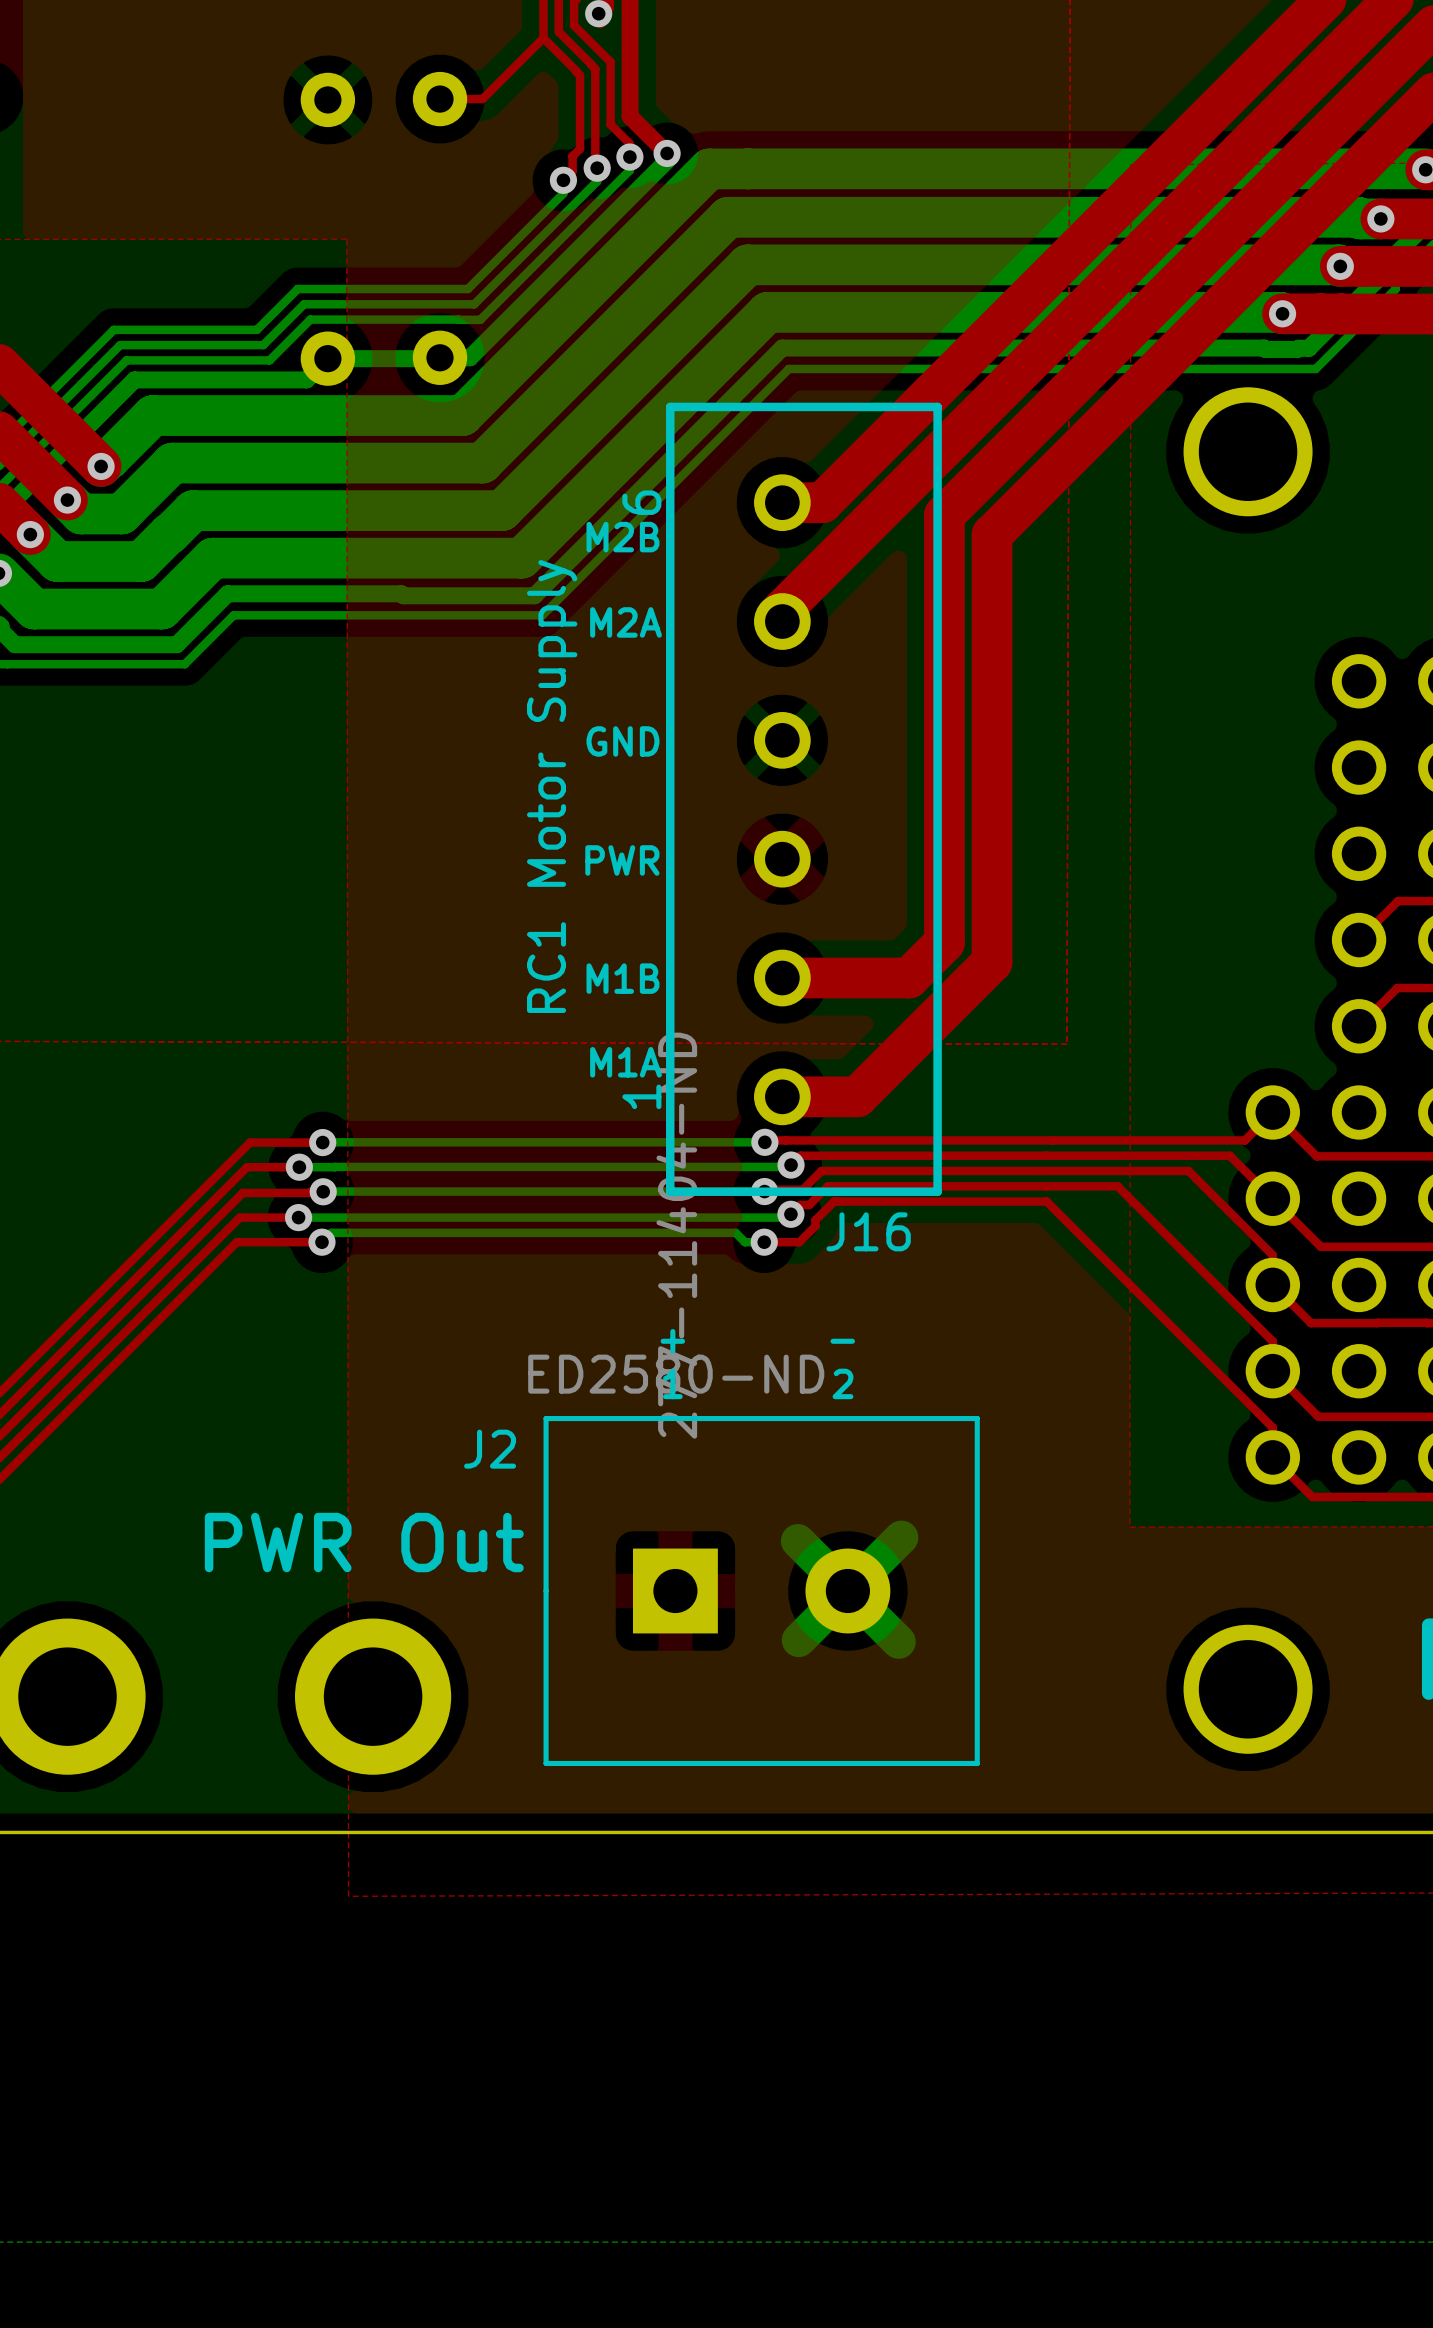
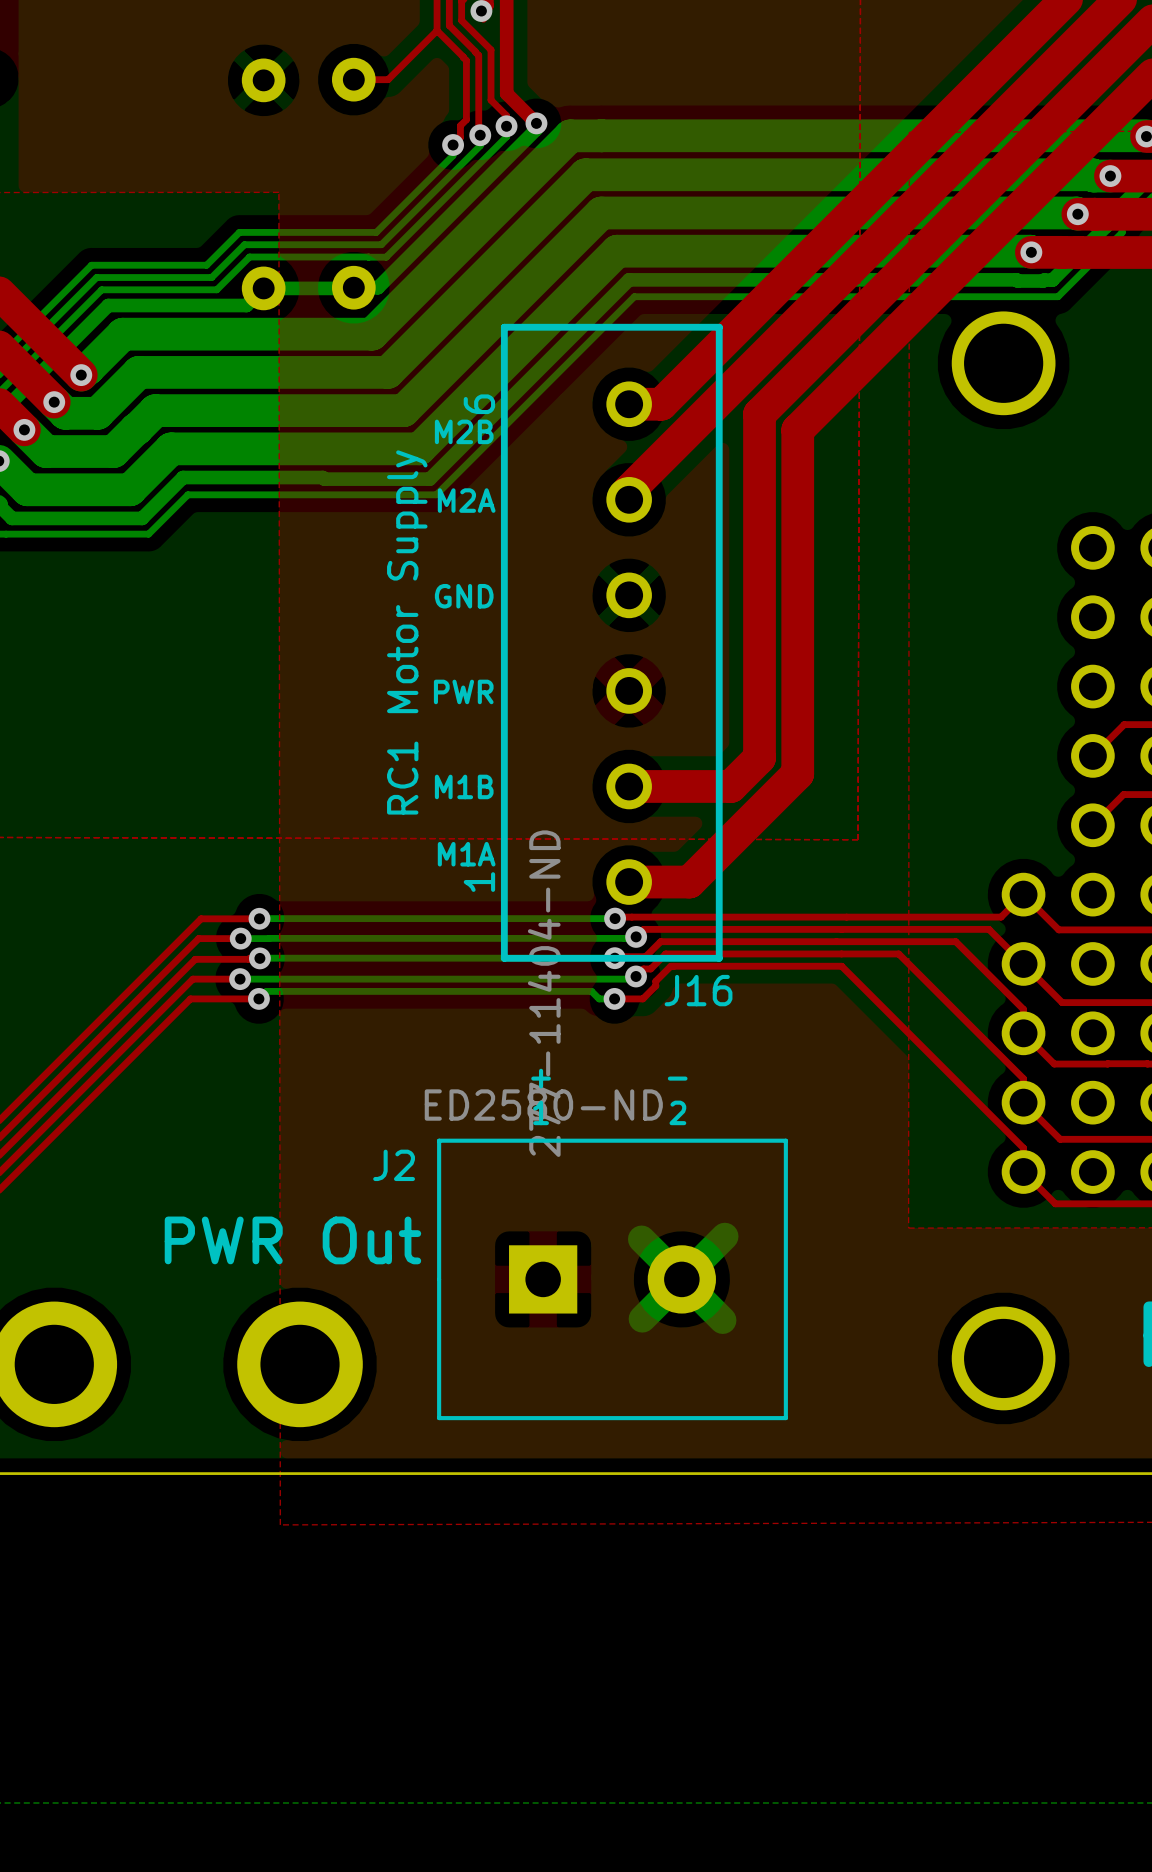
J16 footprint: [666, 402, 942, 1196] -> [500, 323, 723, 962]
text position: M2B (622, 537) -> M2B (464, 431)
text position: M2A (626, 622) -> M2A (466, 500)
text position: GND (622, 741) -> GND (464, 596)
text position: RC1 Motor Supply (552, 786) -> RC1 Motor Supply (407, 632)
text position: PWR (622, 860) -> PWR (463, 691)
text position: M1B (622, 978) -> M1B (464, 786)
text position: M1A (626, 1062) -> M1A (466, 854)

